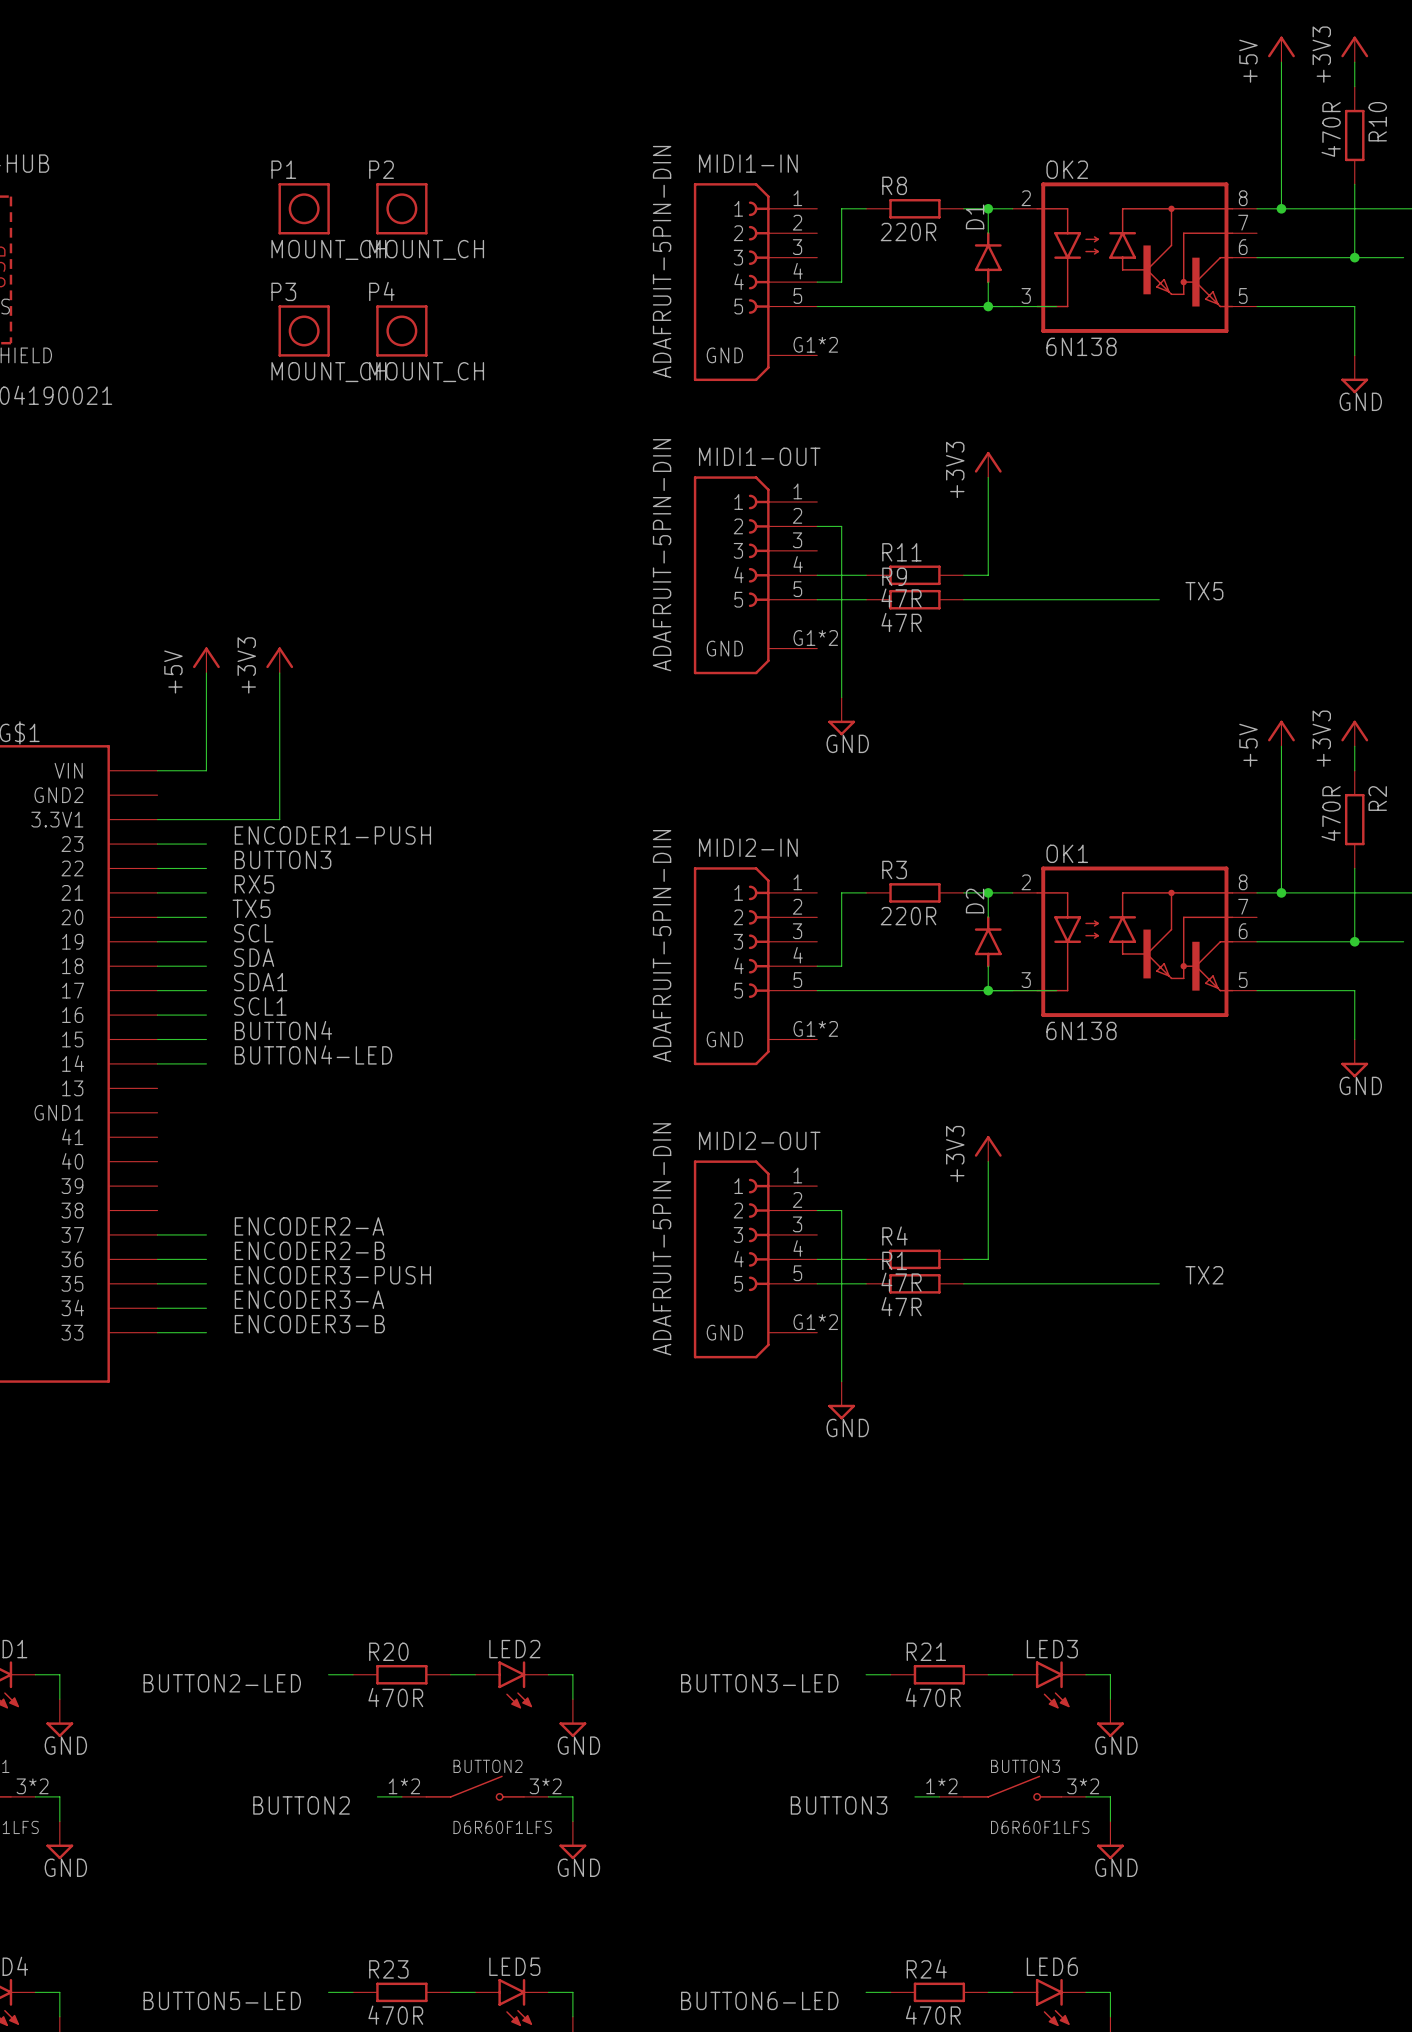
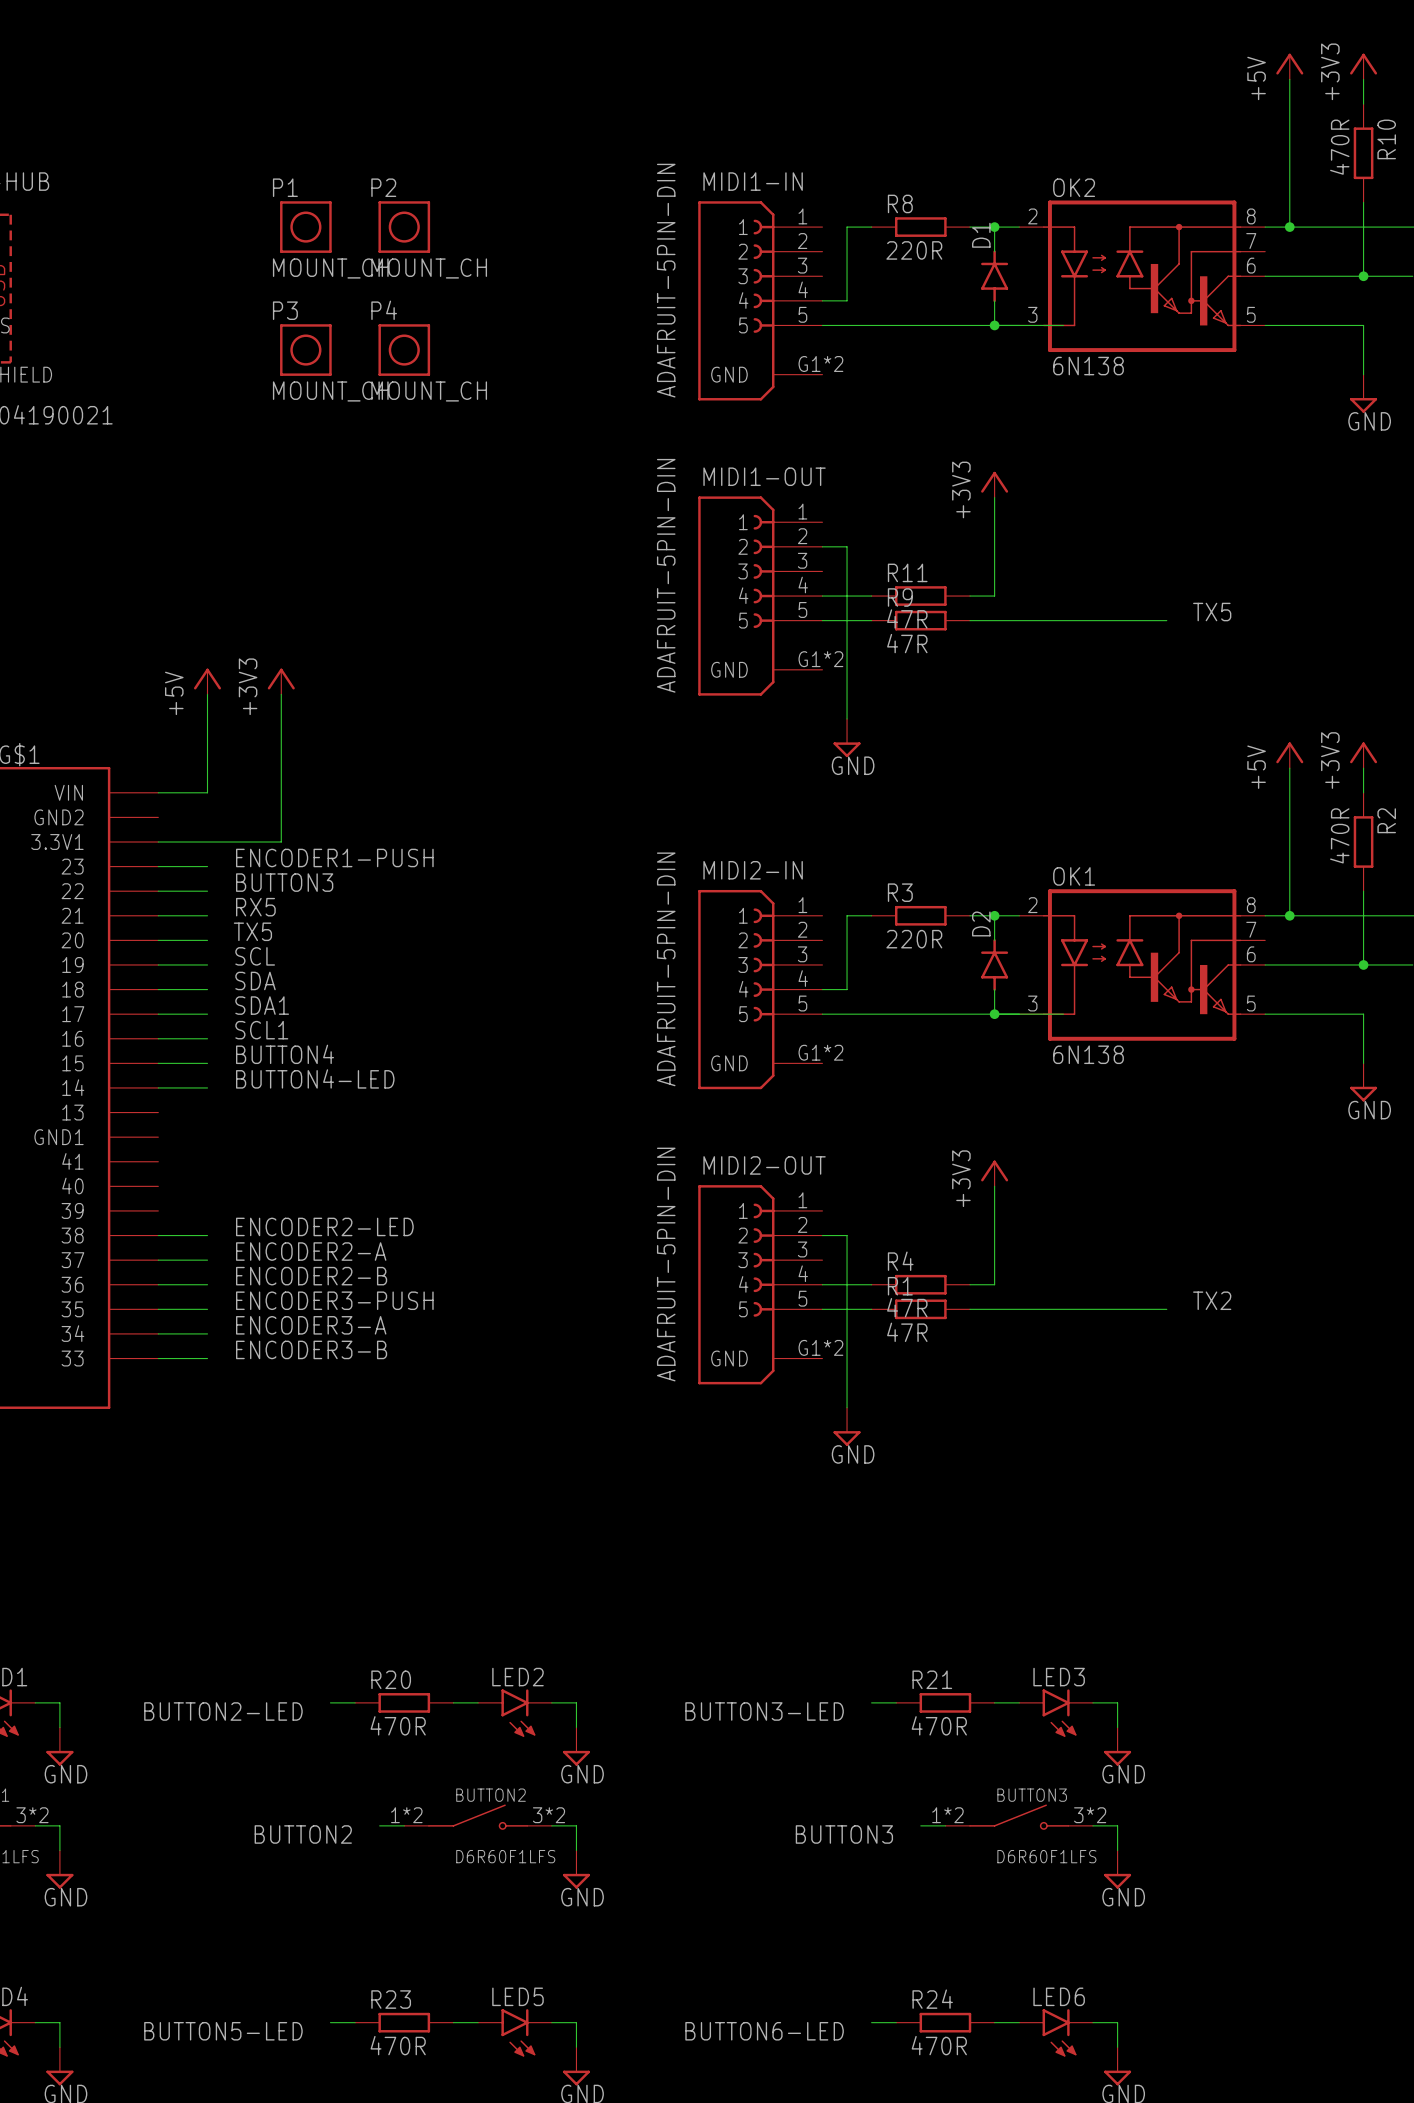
label: none -> ENCODER2-LED (324, 1226)
wire: none -> (158, 1235) (207, 1235)

